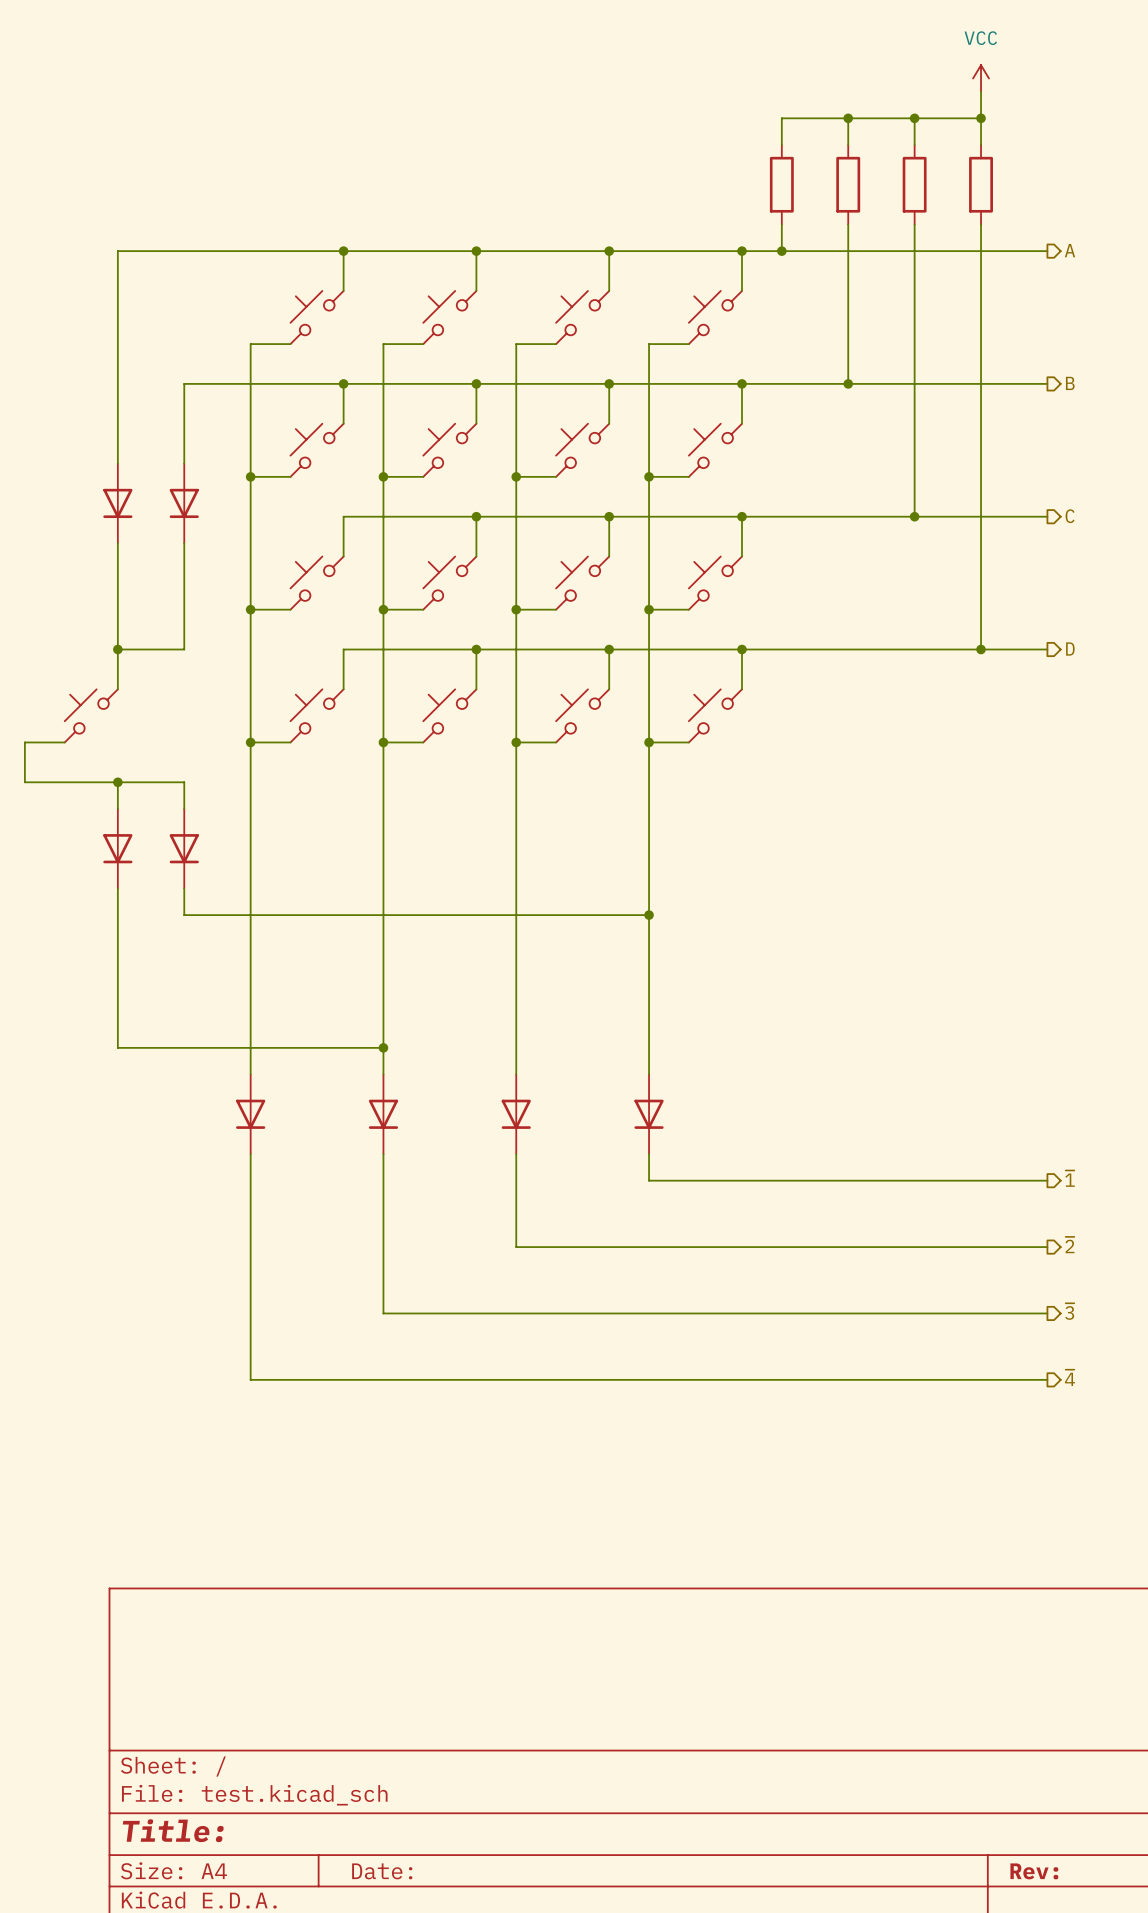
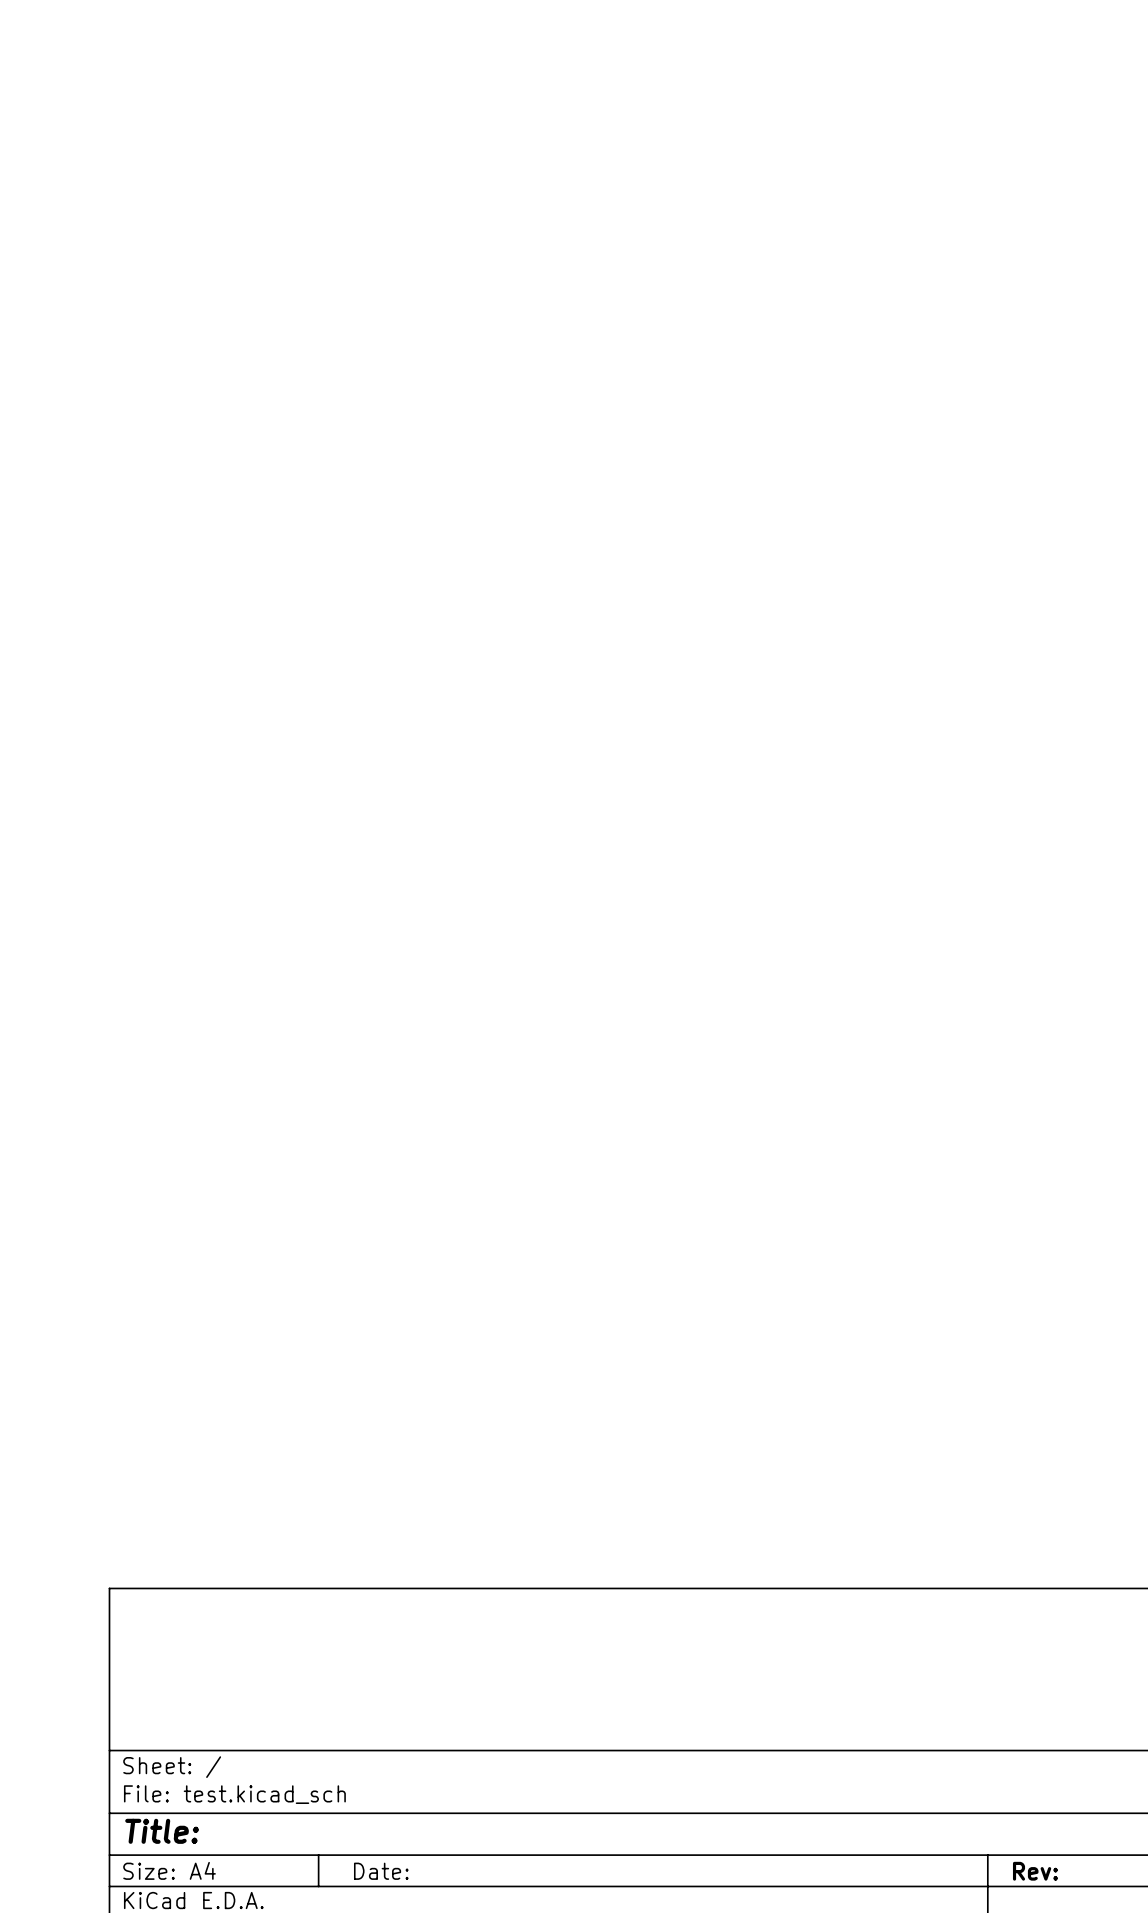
power symbol: VCC (981, 78) -> none
wire: (981, 91) (981, 144) -> none
wire: (848, 118) (848, 144) -> none
junction: (848, 118) -> none
wire: (914, 118) (914, 144) -> none
junction: (914, 118) -> none
wire: (981, 118) (781, 118) (781, 144) -> none
junction: (981, 118) -> none
part: (781, 184) -> none
part: (848, 184) -> none
part: (914, 184) -> none
part: (981, 184) -> none
wire: (781, 224) (781, 251) -> none
wire: (848, 224) (848, 383) -> none
wire: (914, 224) (914, 516) -> none
wire: (981, 224) (981, 649) -> none
hierarchical label: A (1070, 250) -> none
wire: (343, 251) (343, 290) -> none
junction: (343, 251) -> none
wire: (476, 251) (476, 290) -> none
junction: (476, 251) -> none
wire: (609, 251) (609, 290) -> none
junction: (609, 251) -> none
wire: (741, 251) (741, 290) -> none
junction: (741, 251) -> none
junction: (781, 251) -> none
wire: (1047, 251) (117, 251) (117, 463) -> none
part: (317, 317) -> none
part: (449, 317) -> none
part: (582, 317) -> none
part: (715, 317) -> none
wire: (290, 344) (250, 344) (250, 1074) -> none
wire: (423, 344) (383, 344) (383, 1074) -> none
wire: (556, 344) (516, 344) (516, 1074) -> none
wire: (688, 344) (649, 344) (649, 1074) -> none
wire: (343, 383) (343, 423) -> none
junction: (343, 383) -> none
wire: (476, 383) (476, 423) -> none
junction: (476, 383) -> none
wire: (609, 383) (609, 423) -> none
junction: (609, 383) -> none
wire: (741, 383) (741, 423) -> none
junction: (741, 383) -> none
junction: (848, 383) -> none
wire: (1047, 383) (184, 383) (184, 463) -> none
hierarchical label: B (1070, 383) -> none
part: (317, 450) -> none
part: (449, 450) -> none
part: (582, 450) -> none
part: (715, 450) -> none
wire: (250, 476) (290, 476) -> none
junction: (250, 476) -> none
wire: (383, 476) (423, 476) -> none
junction: (383, 476) -> none
wire: (516, 476) (556, 476) -> none
junction: (516, 476) -> none
wire: (649, 476) (688, 476) -> none
junction: (649, 476) -> none
part: (117, 503) -> none
part: (184, 503) -> none
wire: (476, 516) (476, 556) -> none
junction: (476, 516) -> none
wire: (609, 516) (609, 556) -> none
junction: (609, 516) -> none
wire: (741, 516) (741, 556) -> none
junction: (741, 516) -> none
junction: (914, 516) -> none
wire: (1047, 516) (343, 516) (343, 556) -> none
hierarchical label: C (1070, 516) -> none
wire: (117, 543) (117, 689) -> none
wire: (184, 543) (184, 649) (117, 649) -> none
part: (317, 583) -> none
part: (449, 583) -> none
part: (582, 583) -> none
part: (715, 583) -> none
wire: (250, 609) (290, 609) -> none
junction: (250, 609) -> none
wire: (383, 609) (423, 609) -> none
junction: (383, 609) -> none
wire: (516, 609) (556, 609) -> none
junction: (516, 609) -> none
wire: (649, 609) (688, 609) -> none
junction: (649, 609) -> none
junction: (117, 649) -> none
wire: (476, 649) (476, 689) -> none
junction: (476, 649) -> none
wire: (609, 649) (609, 689) -> none
junction: (609, 649) -> none
wire: (741, 649) (741, 689) -> none
junction: (741, 649) -> none
junction: (981, 649) -> none
wire: (1047, 649) (343, 649) (343, 689) -> none
hierarchical label: D (1070, 649) -> none
part: (91, 715) -> none
part: (317, 715) -> none
part: (449, 715) -> none
part: (582, 715) -> none
part: (715, 715) -> none
wire: (64, 742) (24, 742) (24, 782) (184, 782) (184, 808) -> none
wire: (250, 742) (290, 742) -> none
junction: (250, 742) -> none
wire: (383, 742) (423, 742) -> none
junction: (383, 742) -> none
wire: (516, 742) (556, 742) -> none
junction: (516, 742) -> none
wire: (649, 742) (688, 742) -> none
junction: (649, 742) -> none
wire: (117, 782) (117, 808) -> none
junction: (117, 782) -> none
part: (117, 848) -> none
part: (184, 848) -> none
wire: (117, 888) (117, 1047) (383, 1047) -> none
wire: (184, 888) (184, 915) (649, 915) -> none
junction: (649, 915) -> none
junction: (383, 1047) -> none
part: (250, 1114) -> none
part: (383, 1114) -> none
part: (516, 1114) -> none
part: (649, 1114) -> none
wire: (250, 1154) (250, 1379) (1047, 1379) -> none
wire: (383, 1154) (383, 1313) (1047, 1313) -> none
wire: (516, 1154) (516, 1247) (1047, 1247) -> none
wire: (649, 1154) (649, 1180) (1047, 1180) -> none
hierarchical label: ~{1} (1070, 1178) -> none
hierarchical label: ~{2} (1070, 1245) -> none
hierarchical label: ~{3} (1069, 1311) -> none
hierarchical label: ~{4} (1069, 1377) -> none

